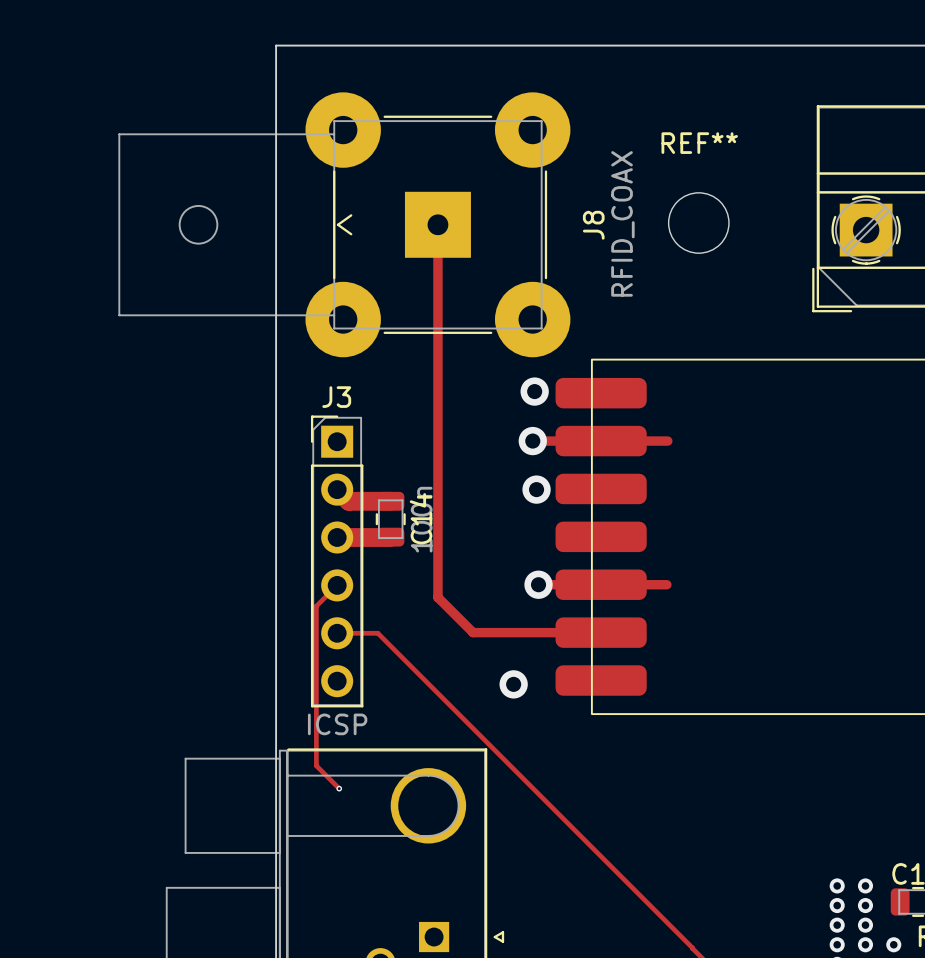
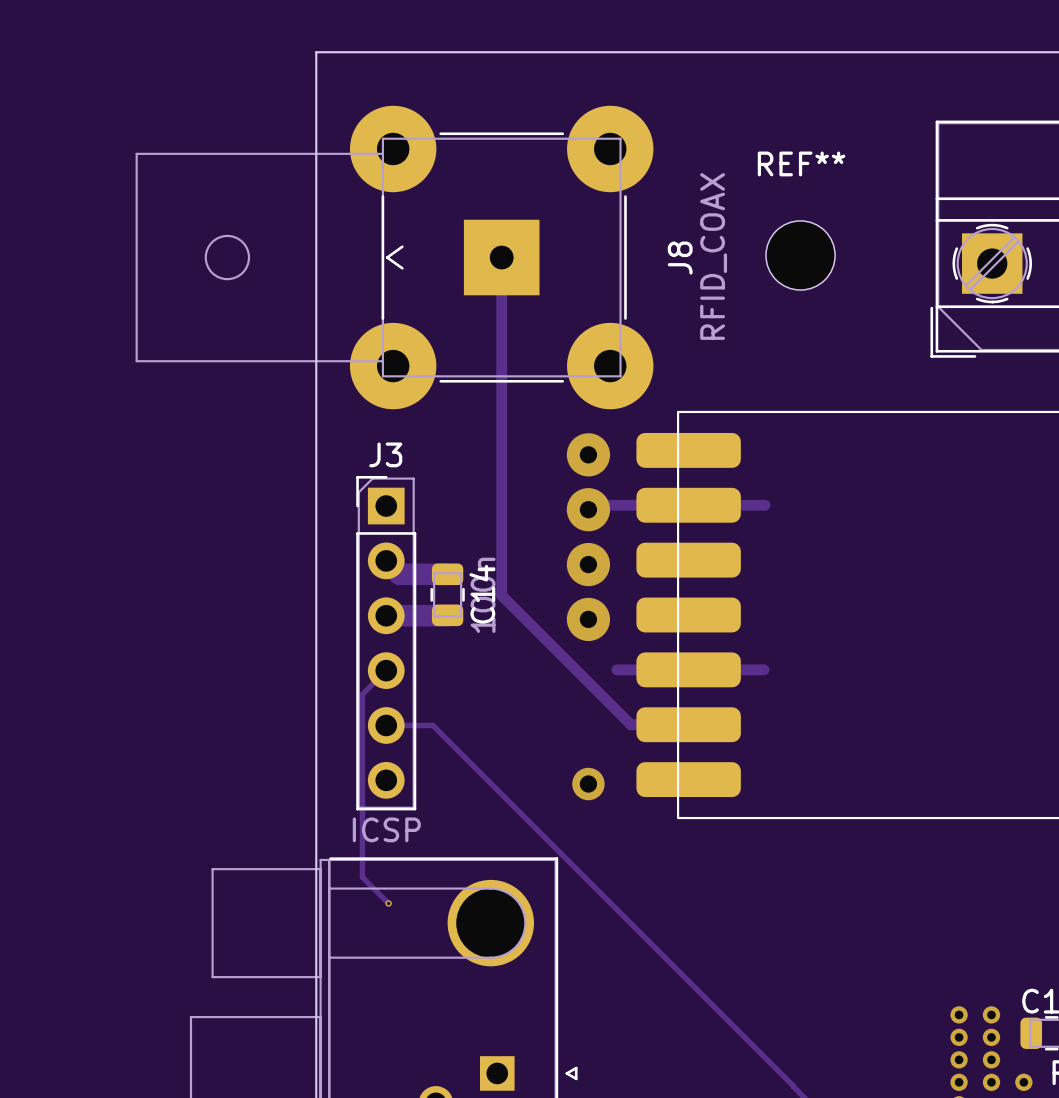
via: (534, 391) -> none
via: none -> (588, 454)
via: (532, 441) -> none
via: none -> (588, 509)
via: (536, 489) -> none
via: none -> (588, 564)
track: (437, 519) (437, 597) (473, 632) (550, 632) -> (501, 595) (630, 724)
via: none -> (588, 619)
via: (538, 584) -> none

